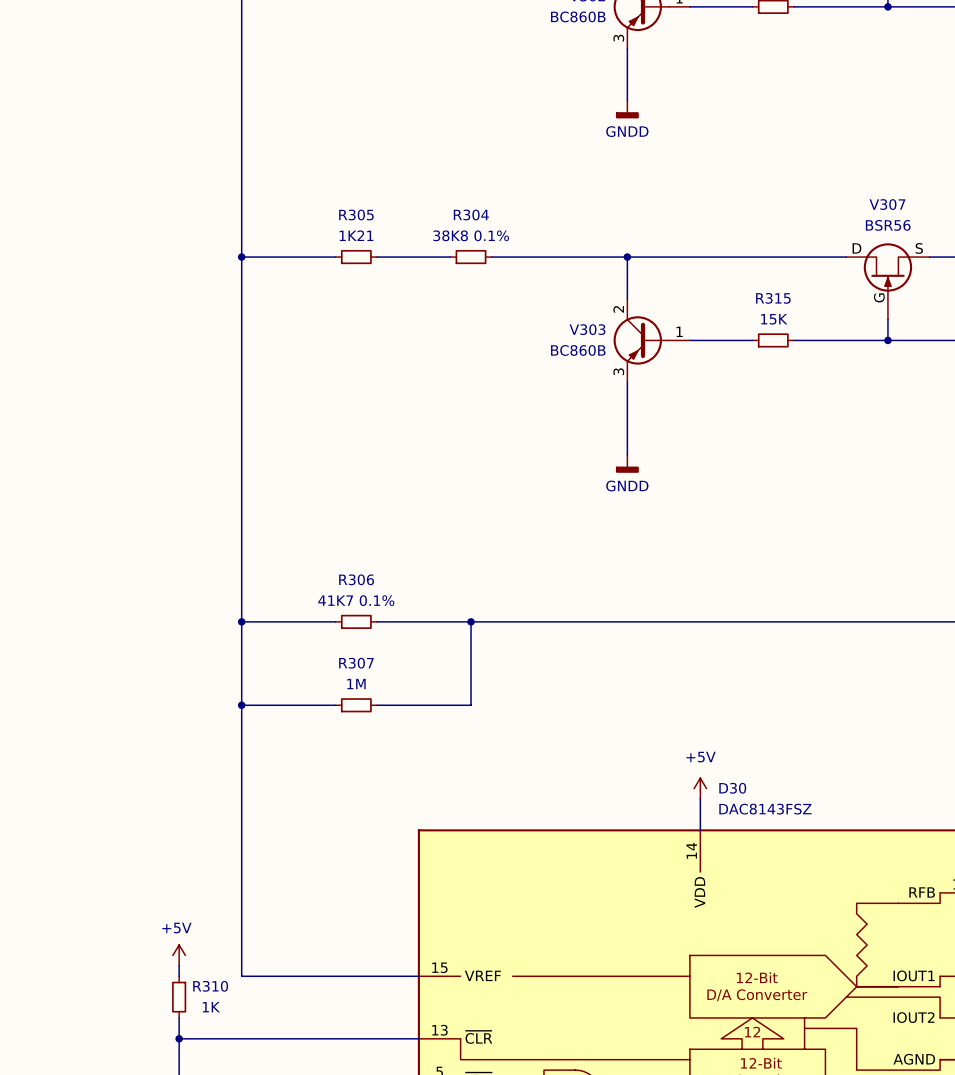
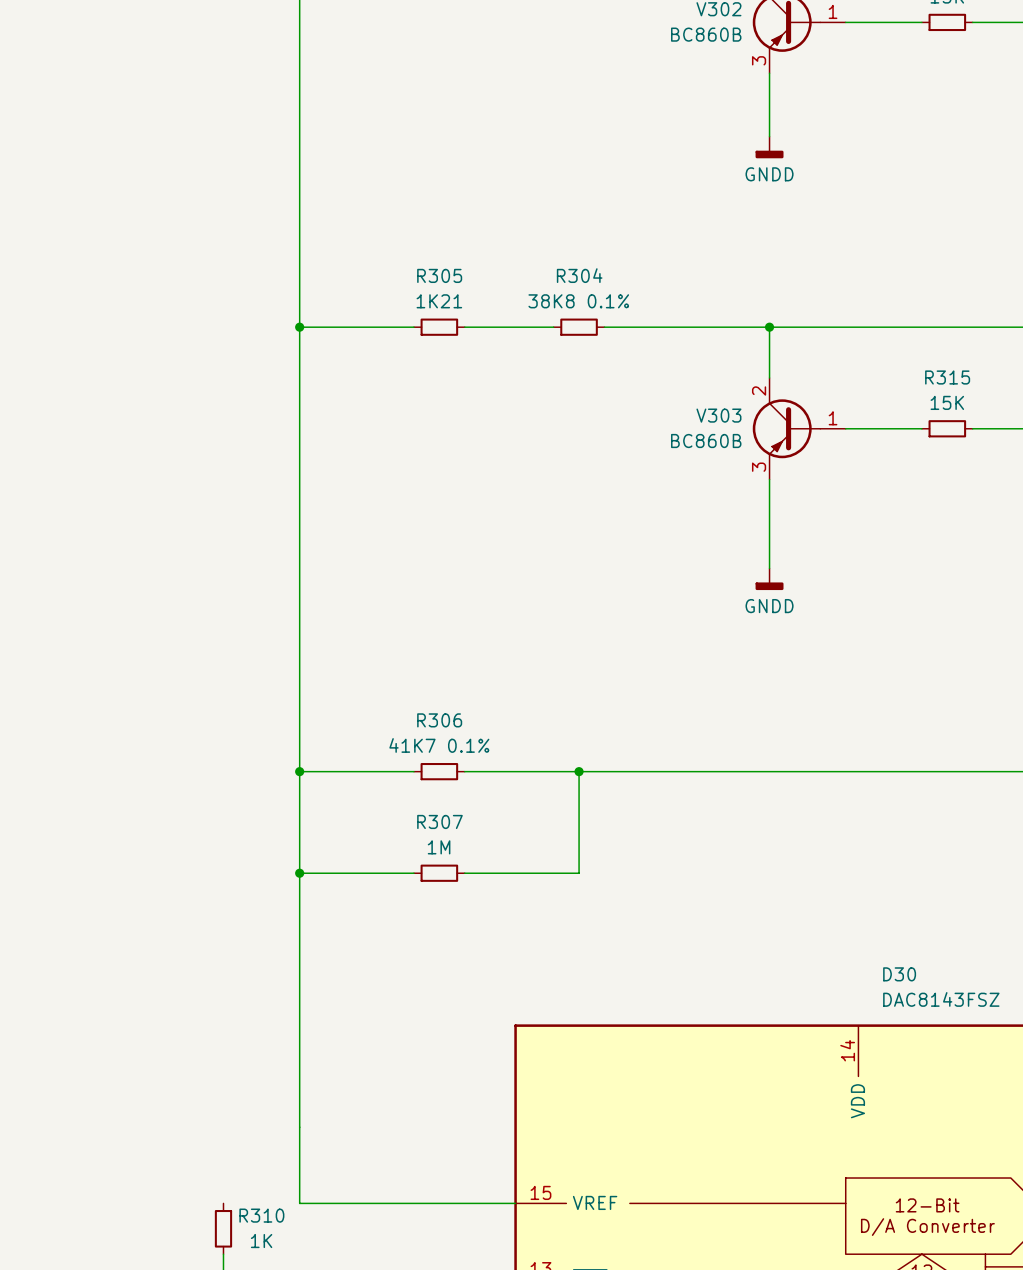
power symbol: +5V (700, 788) -> none
wire: (700, 799) (700, 830) -> none
power symbol: +5V (179, 955) -> none
wire: (179, 965) (179, 976) -> none

